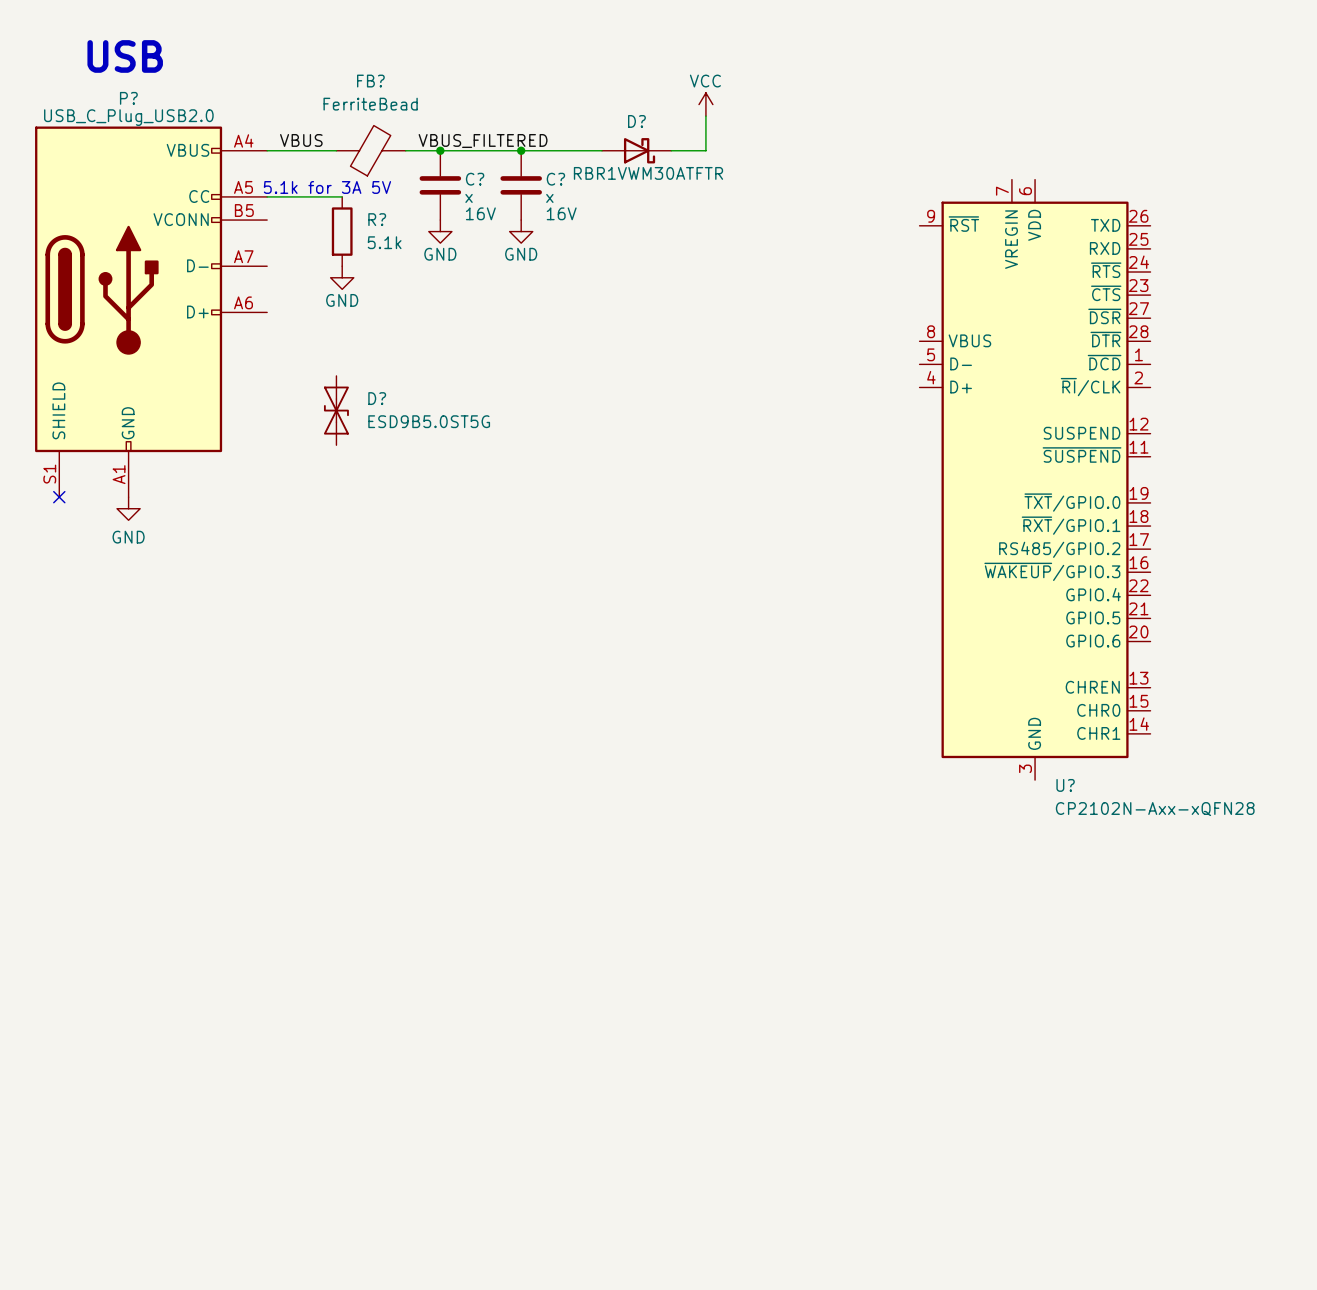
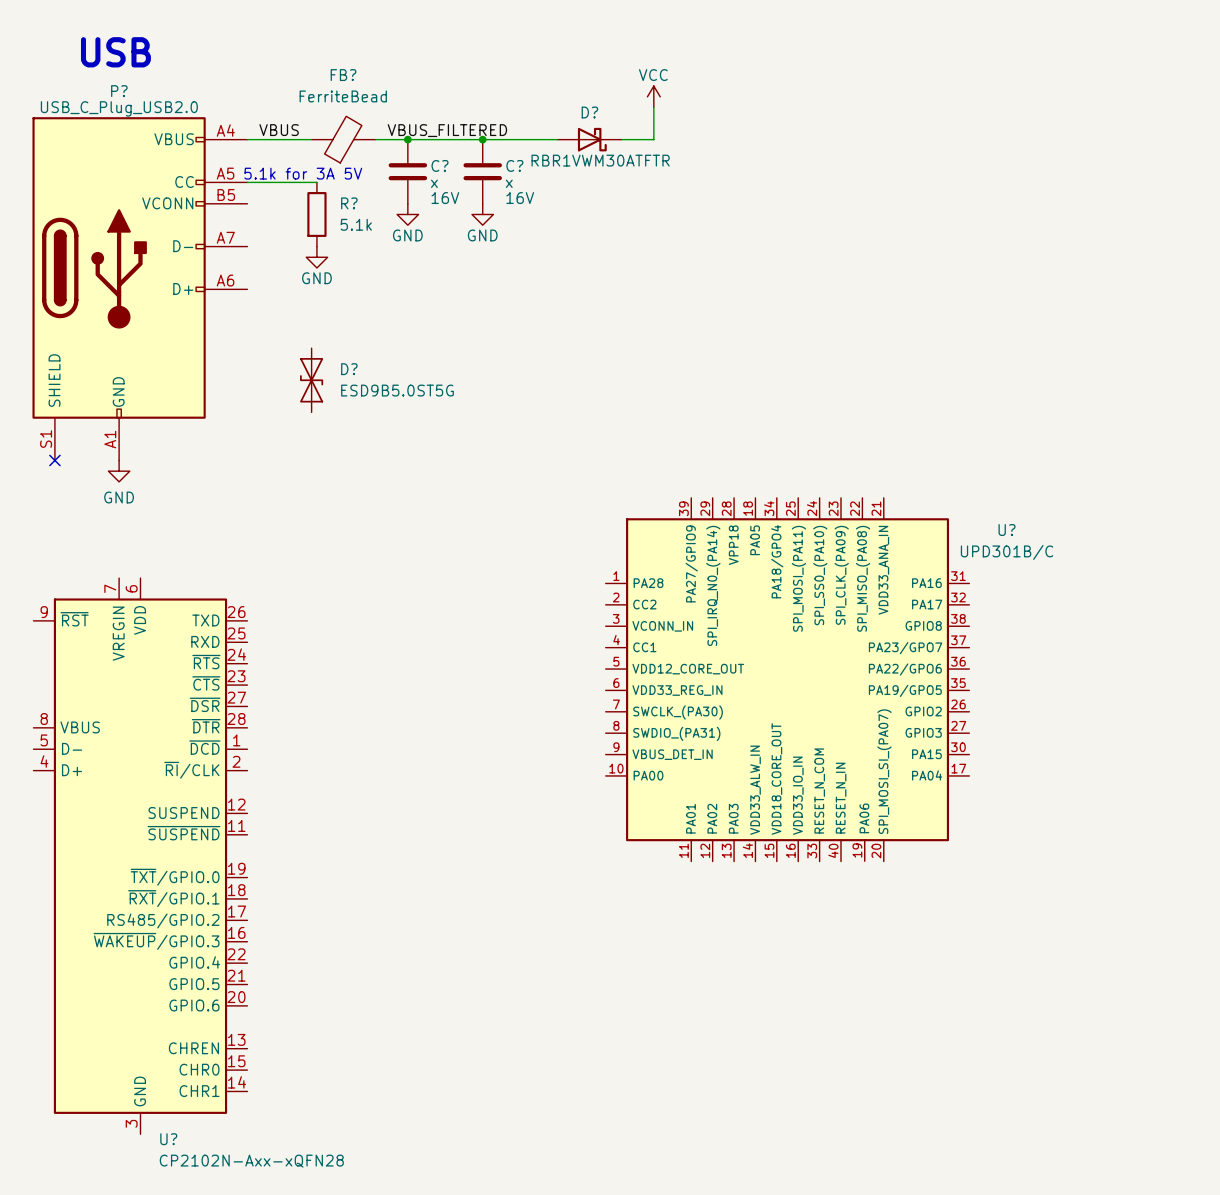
U?: CP2102N-Axx-xQFN28 (1035, 479) -> none
U?: none -> UPD301B/C (787, 679)
U?: none -> CP2102N-Axx-xQFN28 (140, 856)

